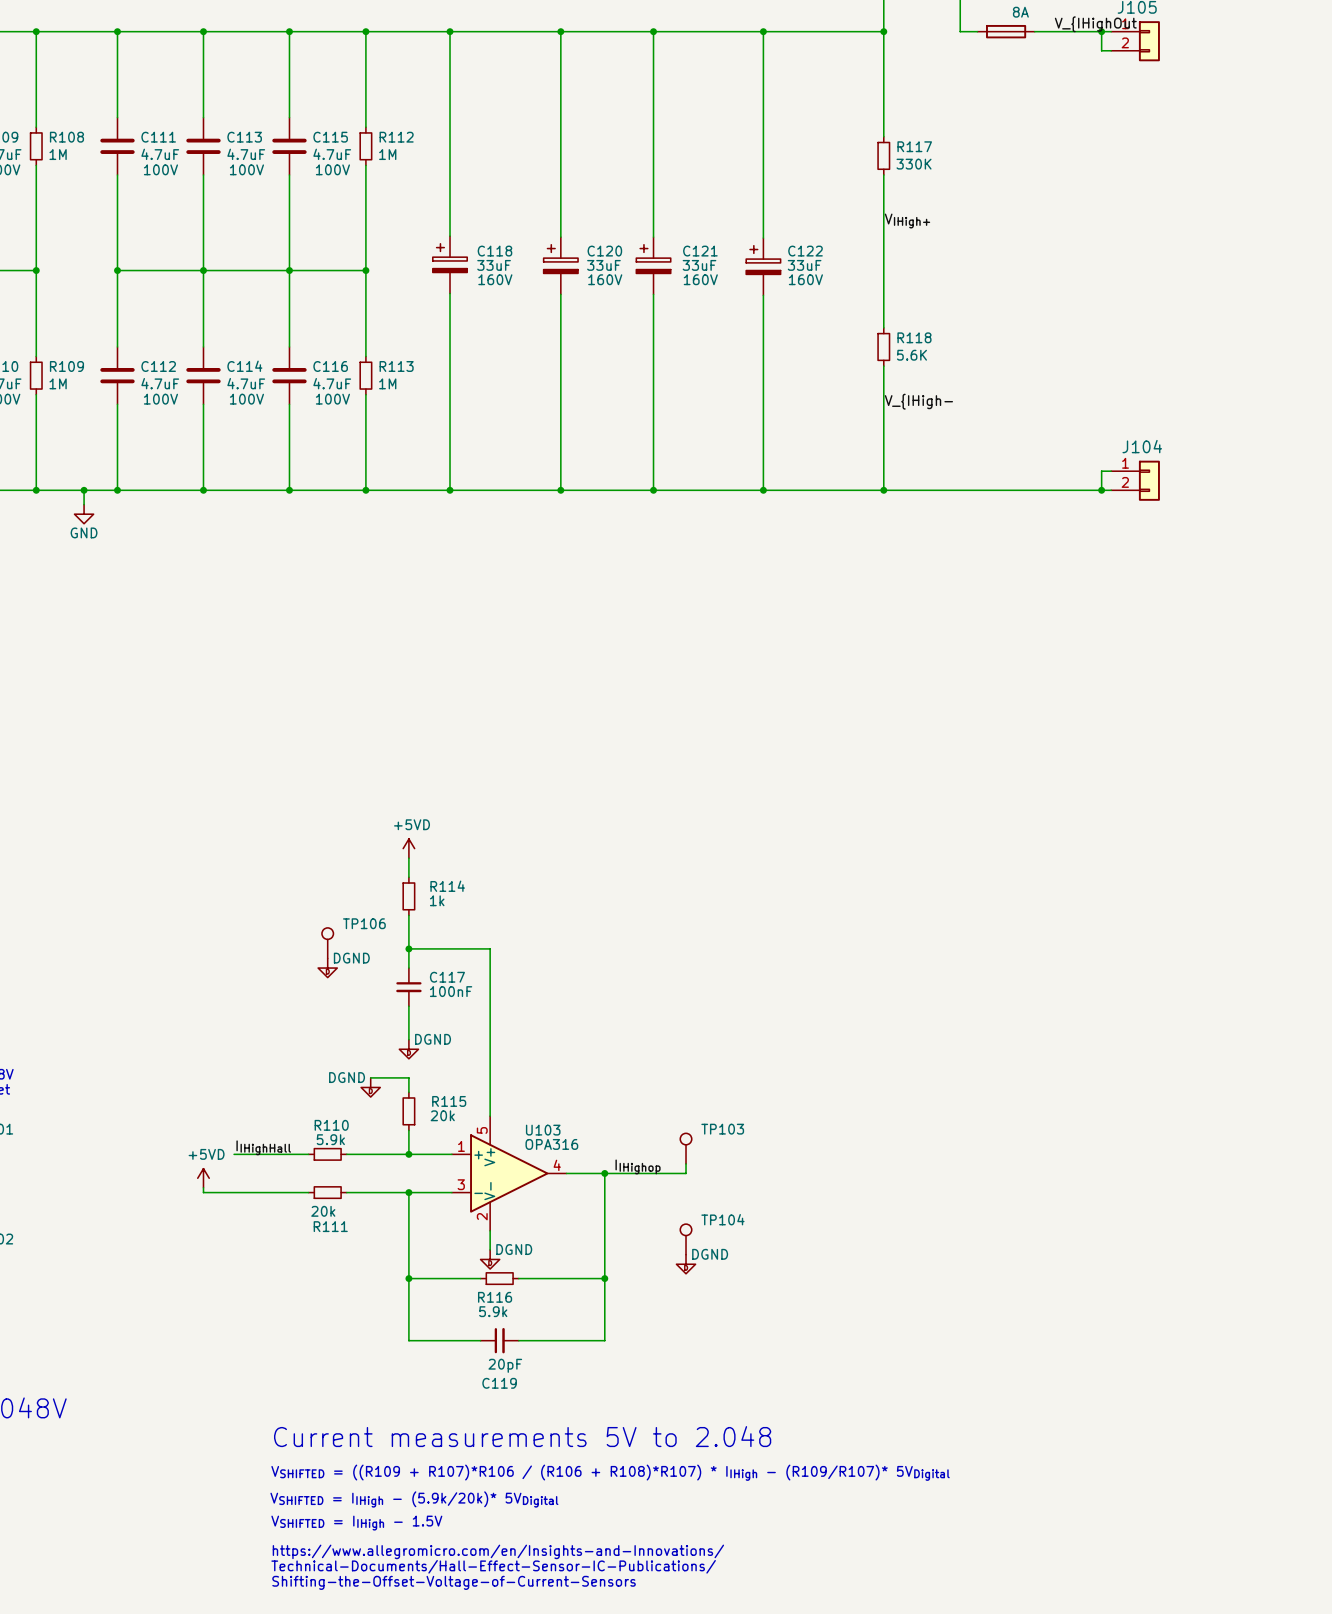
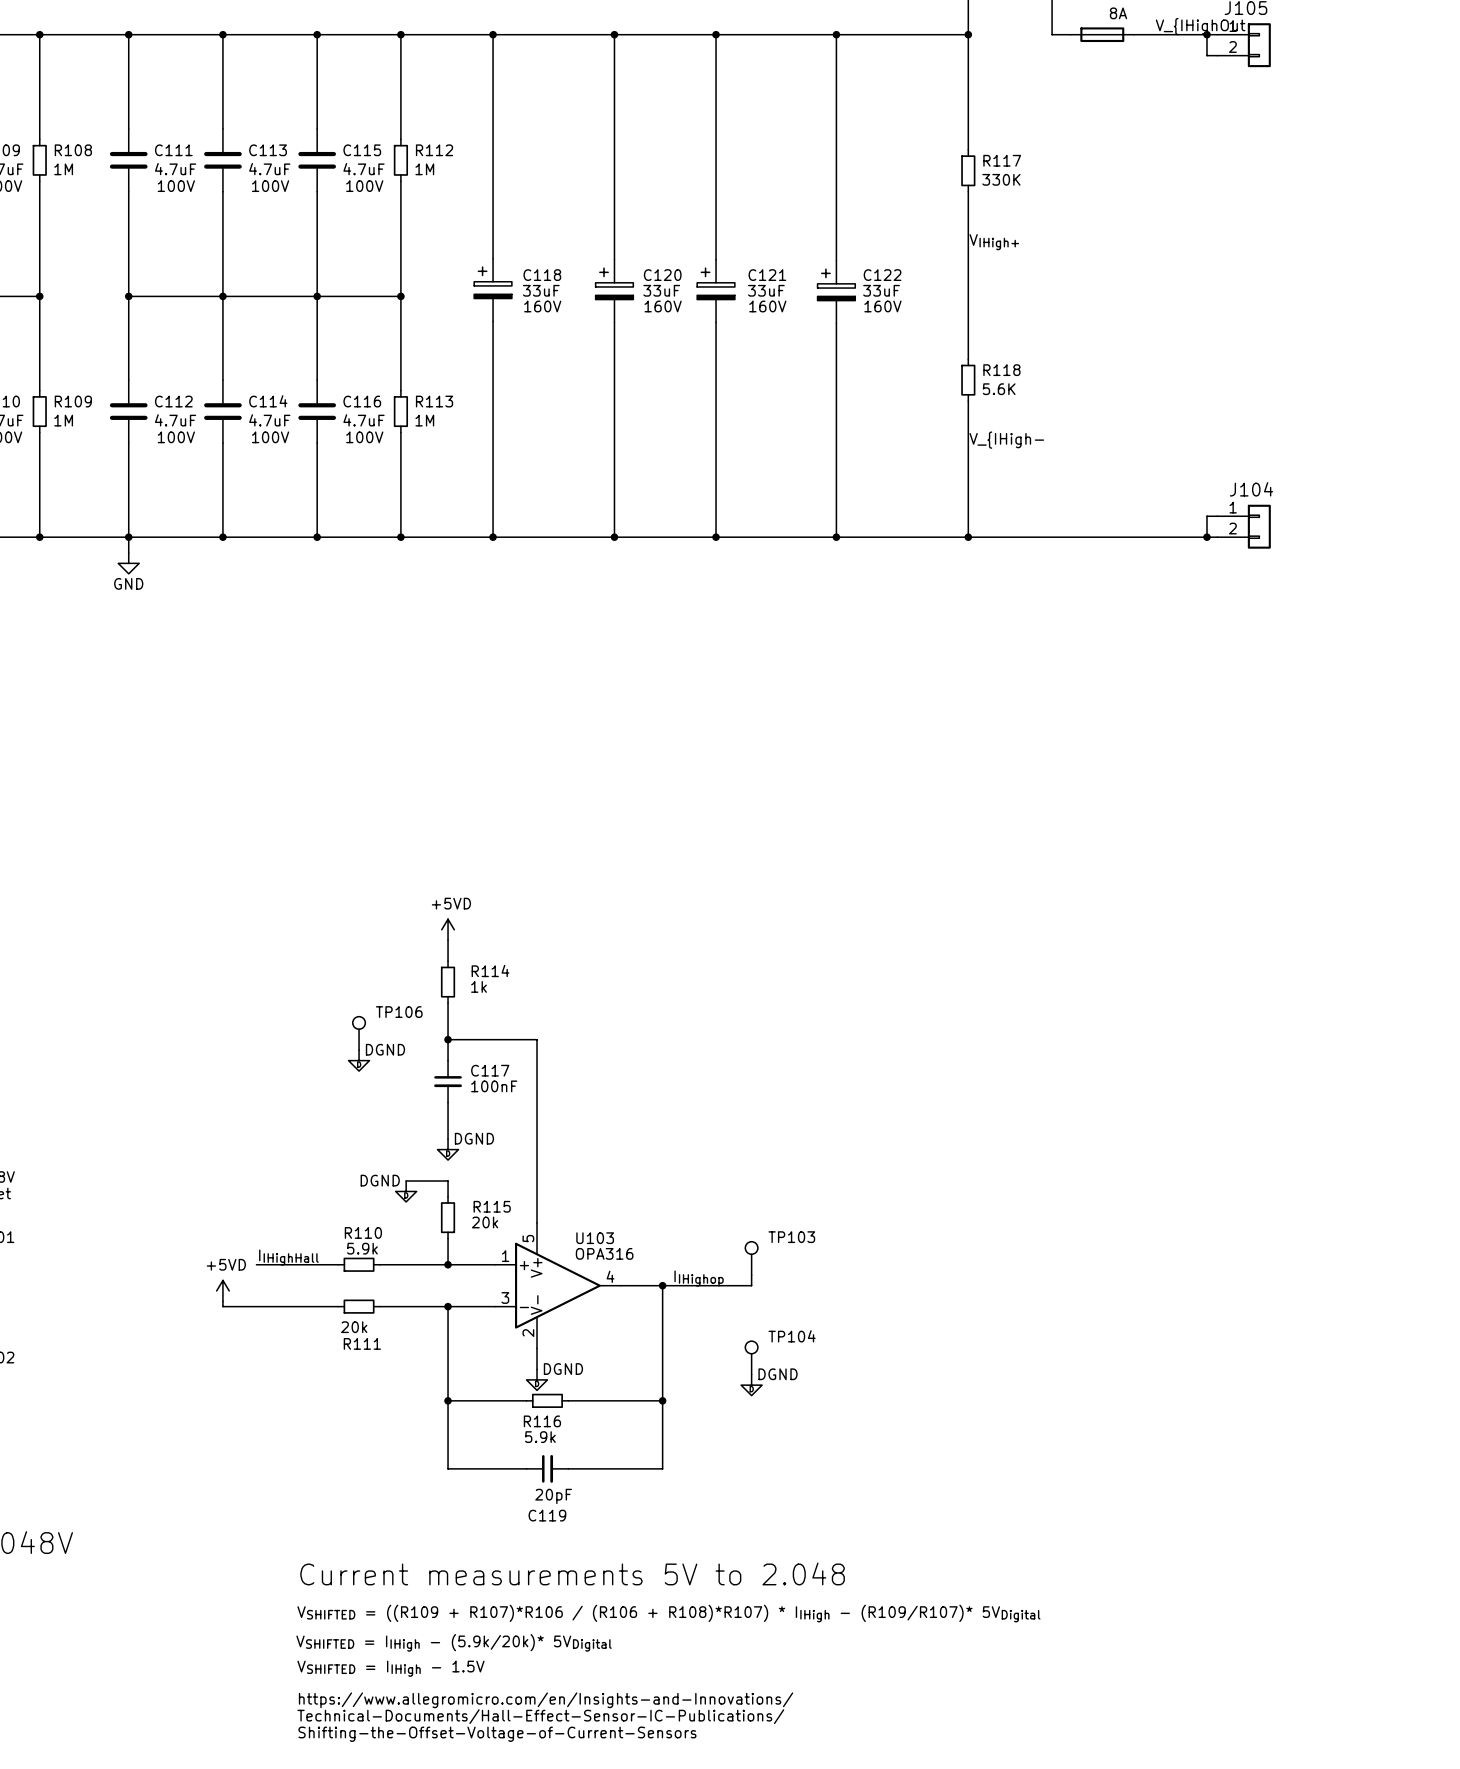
wire: (84, 490) (84, 504) -> (128, 537) (128, 552)
junction: (84, 490) -> none
power symbol position: GND (84, 514) -> GND (128, 563)

